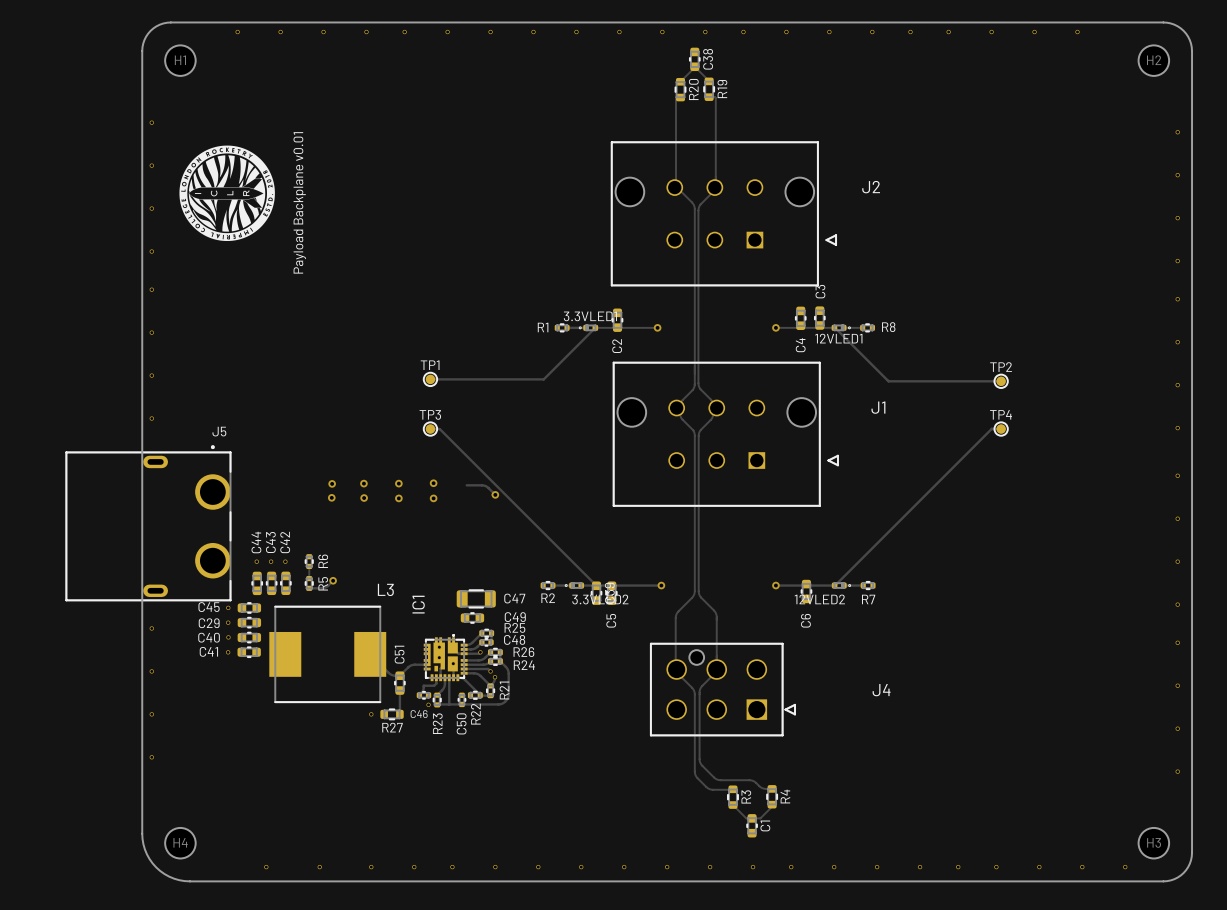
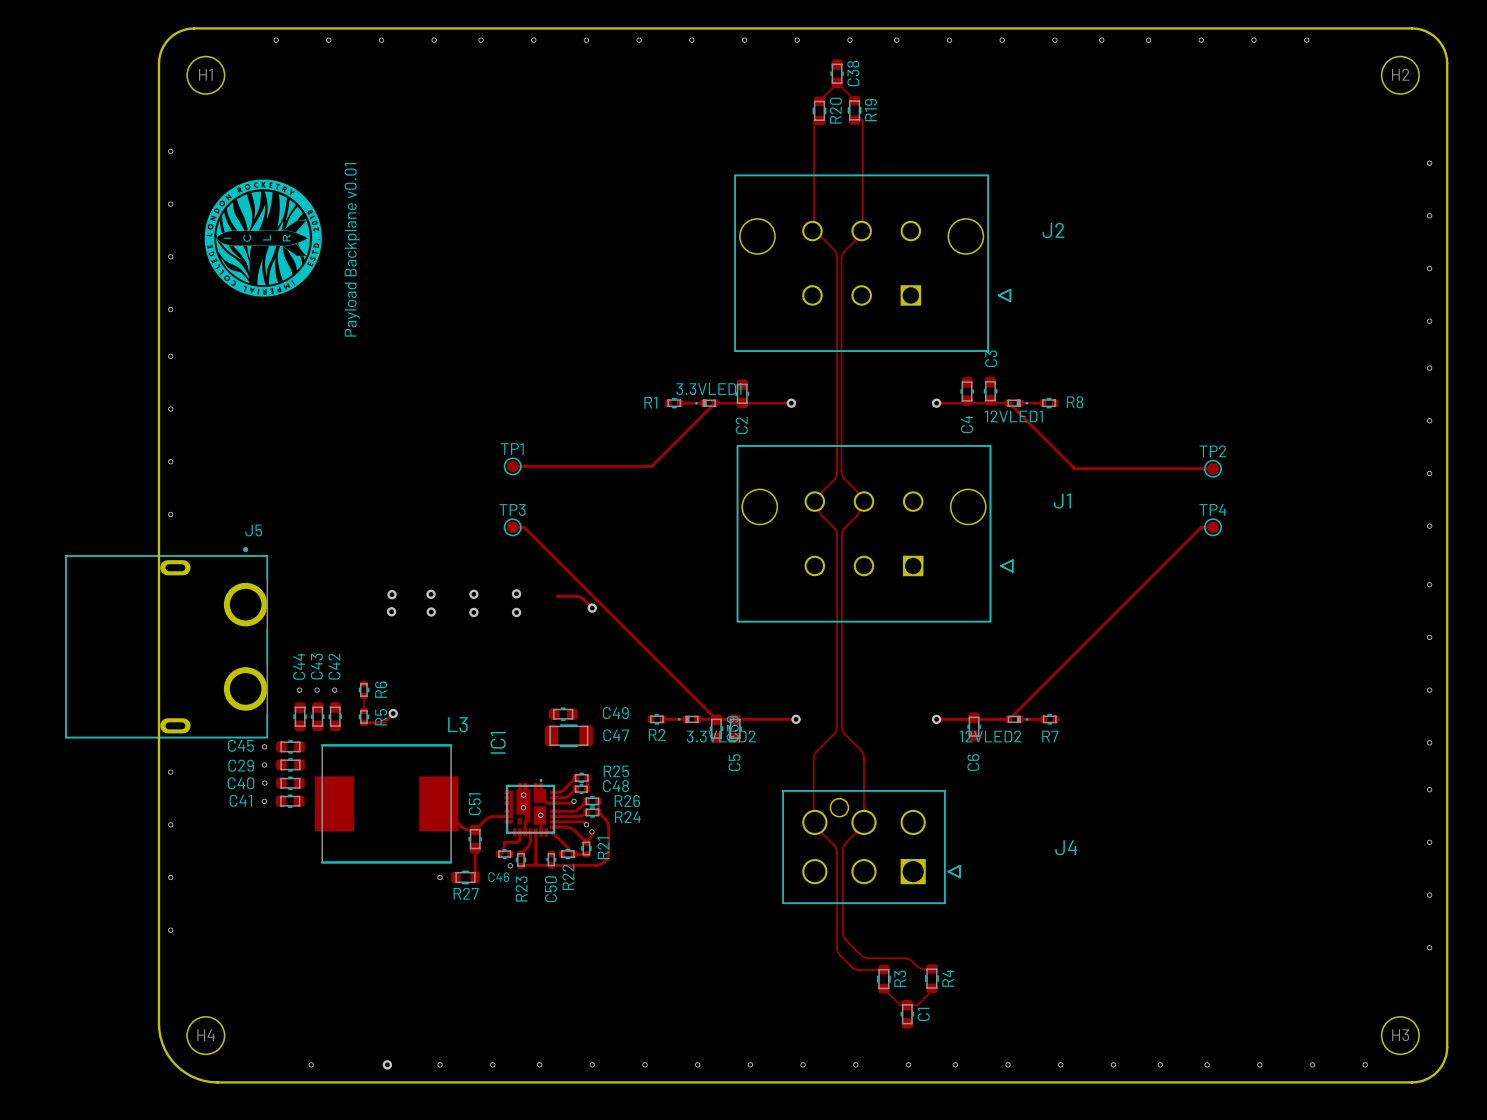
C49 position: (472, 617) -> (563, 714)
via: (319, 867) -> none
via: none -> (387, 1064)

